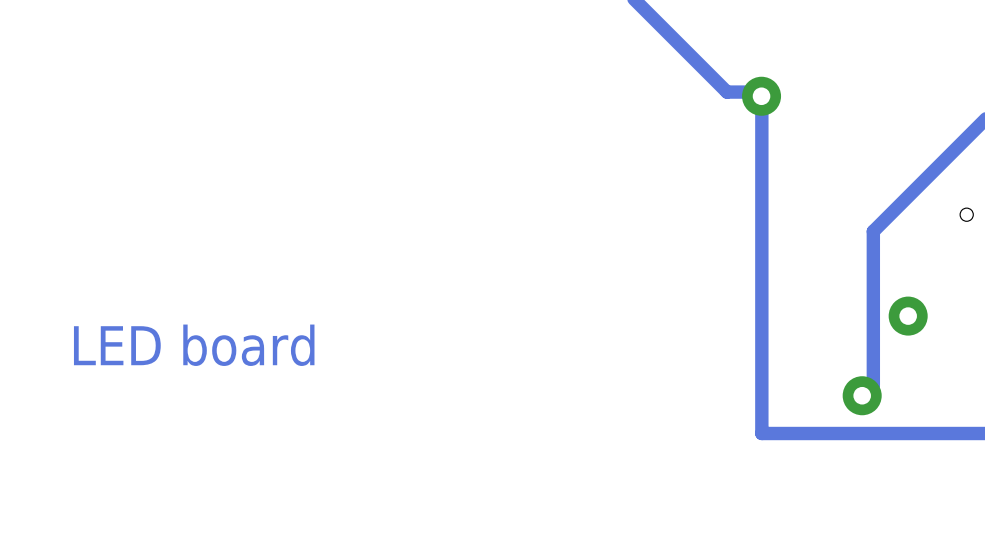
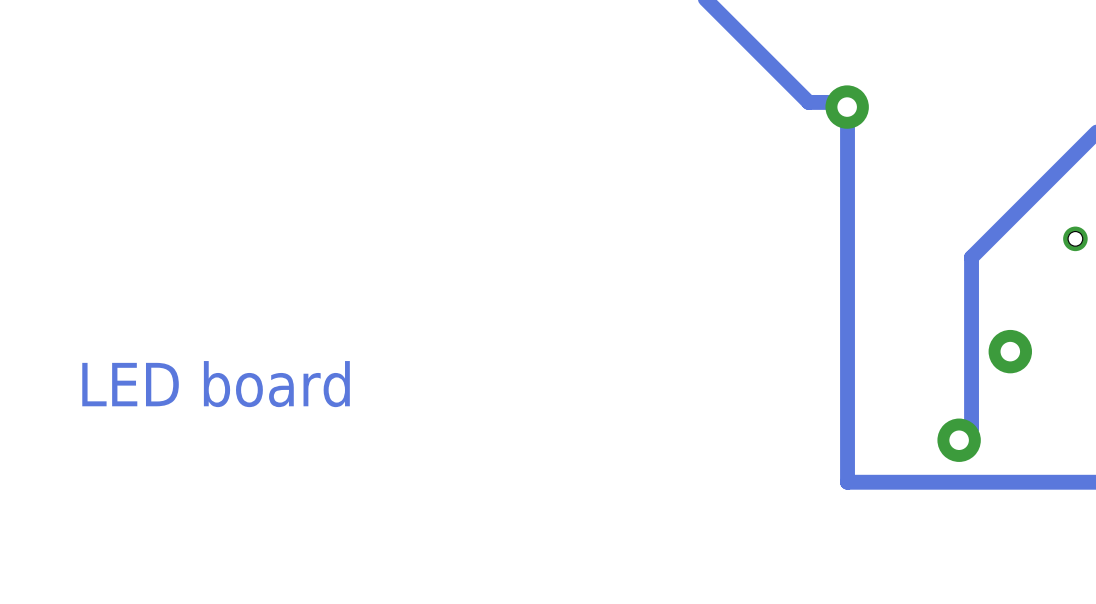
via: none -> (1075, 238)

